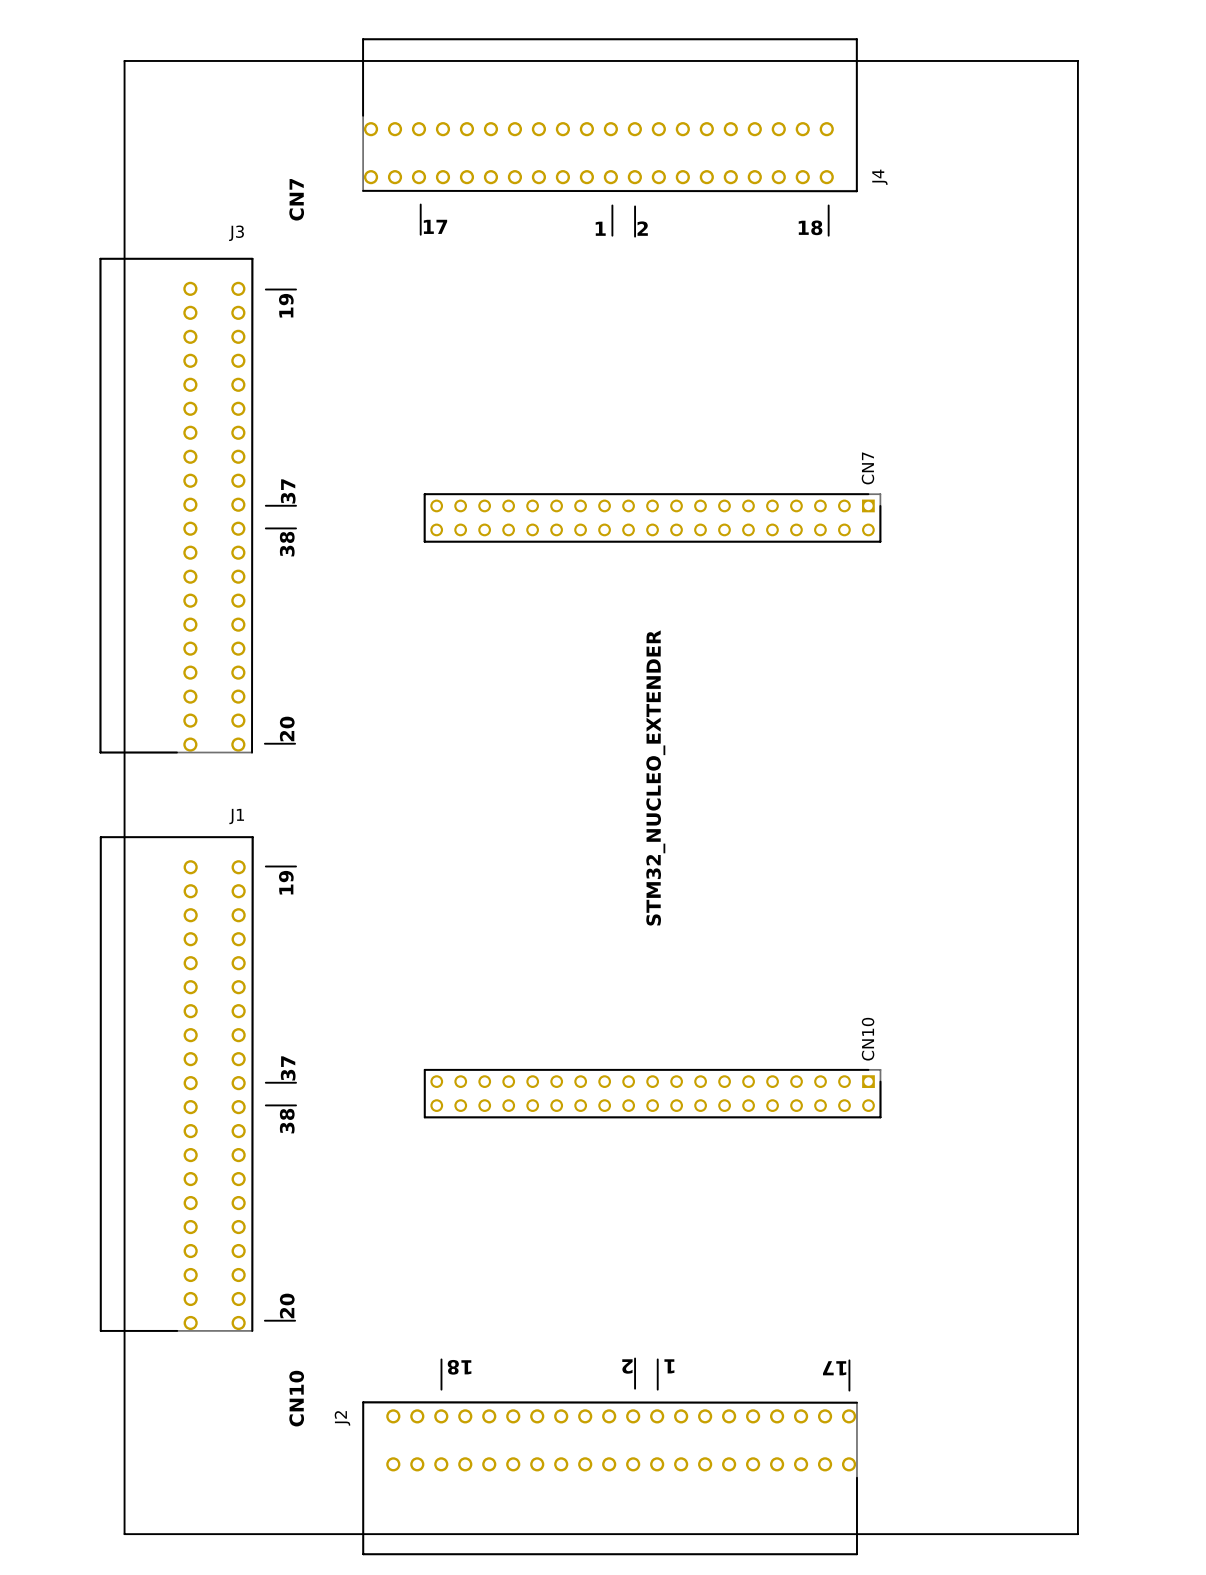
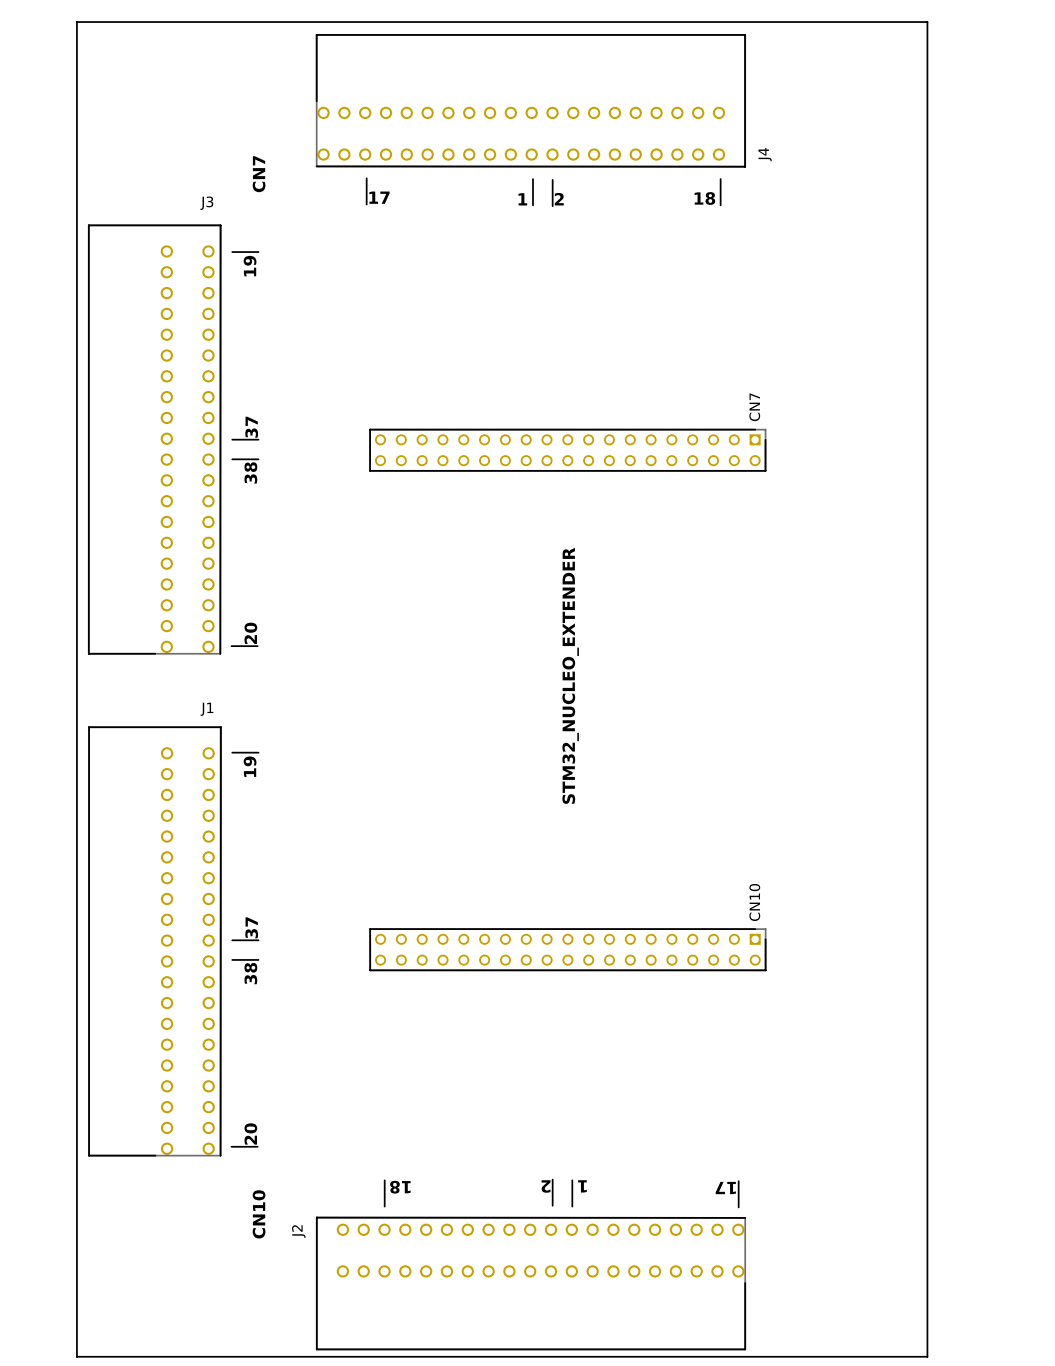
board edge: (124, 60) (1077, 60) (1077, 1534) (124, 1534) (124, 60) -> (76, 22) (76, 1356) (927, 1356) (927, 22) (76, 22)

